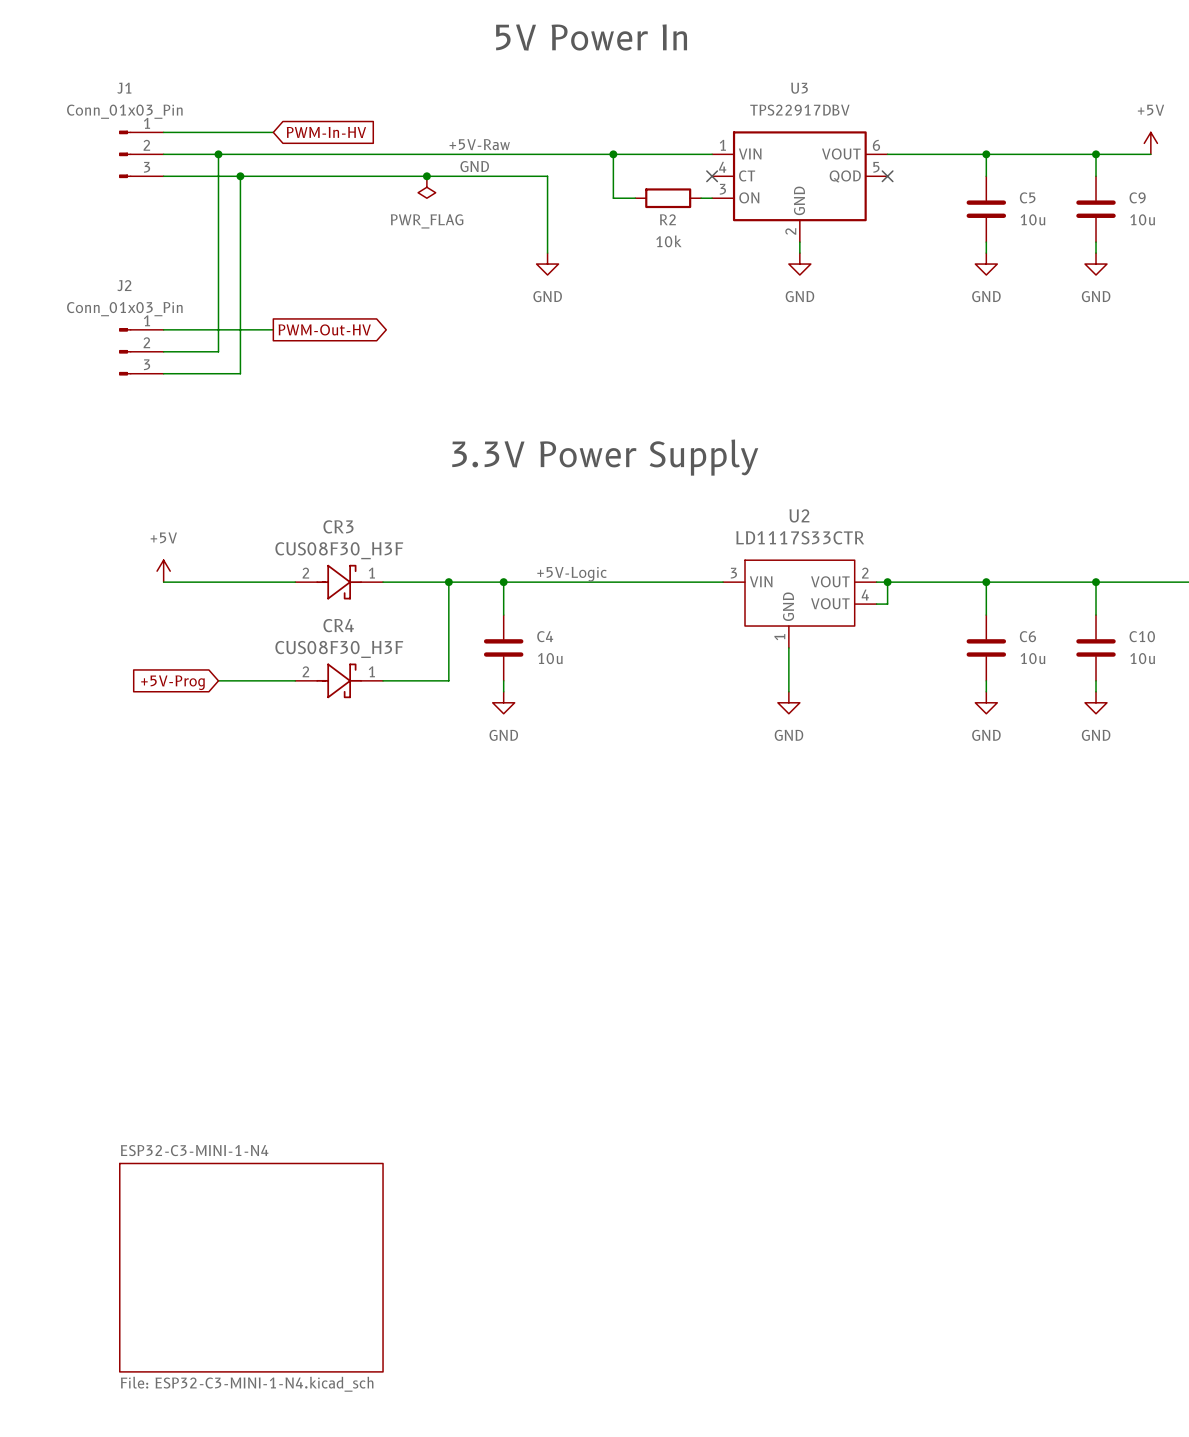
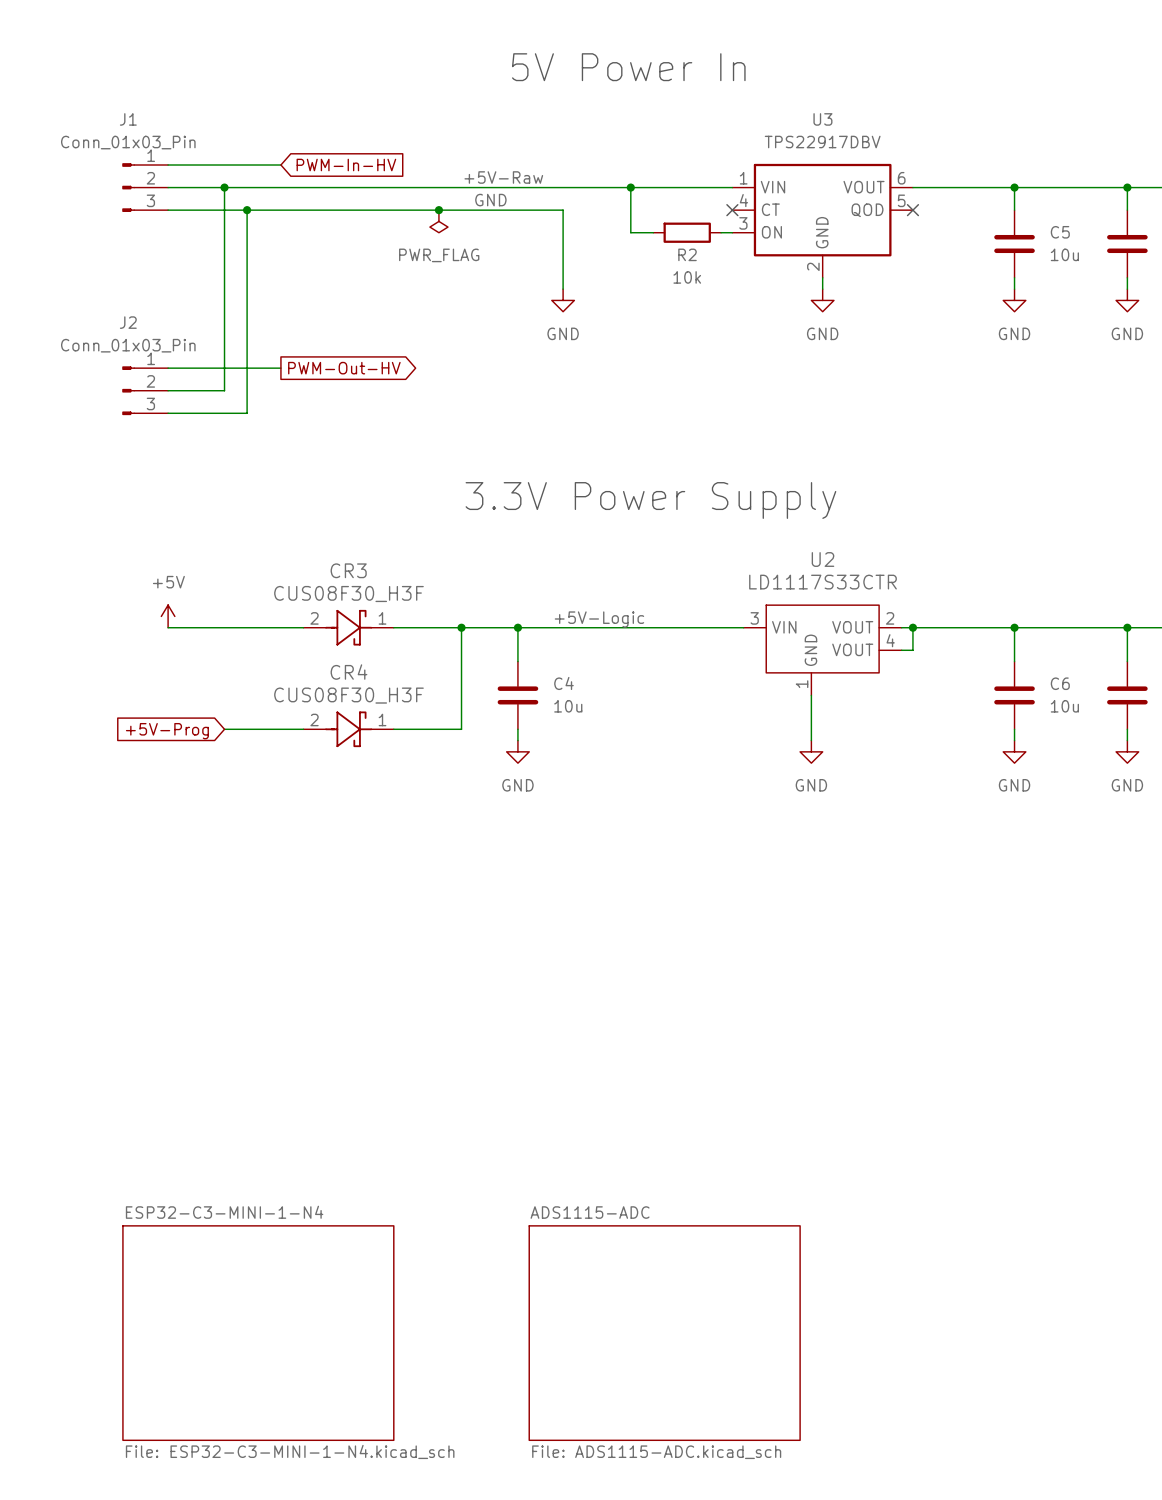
sheet ADS1115-ADC: none -> File: ADS1115-ADC.kicad_sch (664, 1333)

